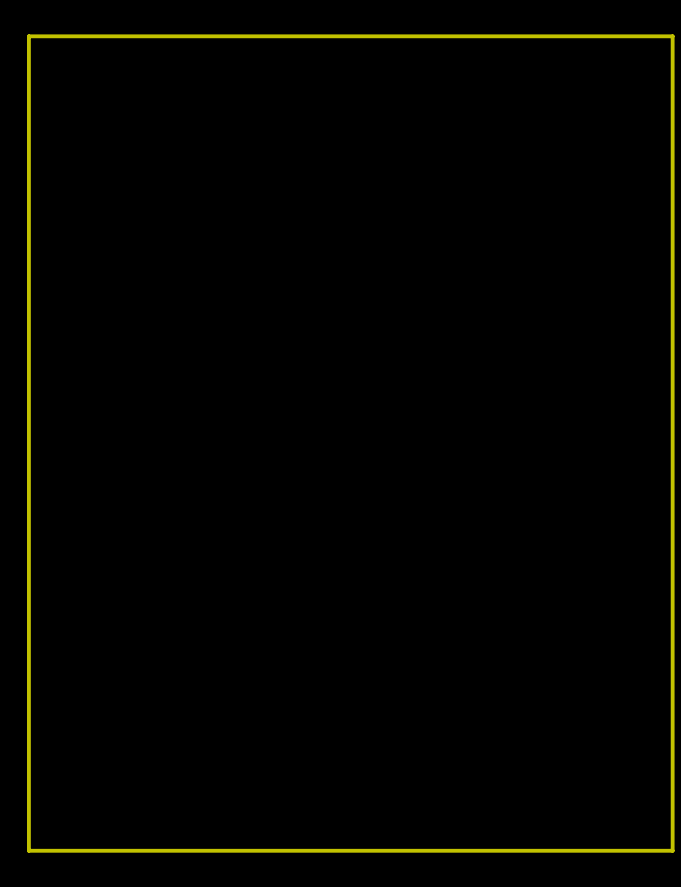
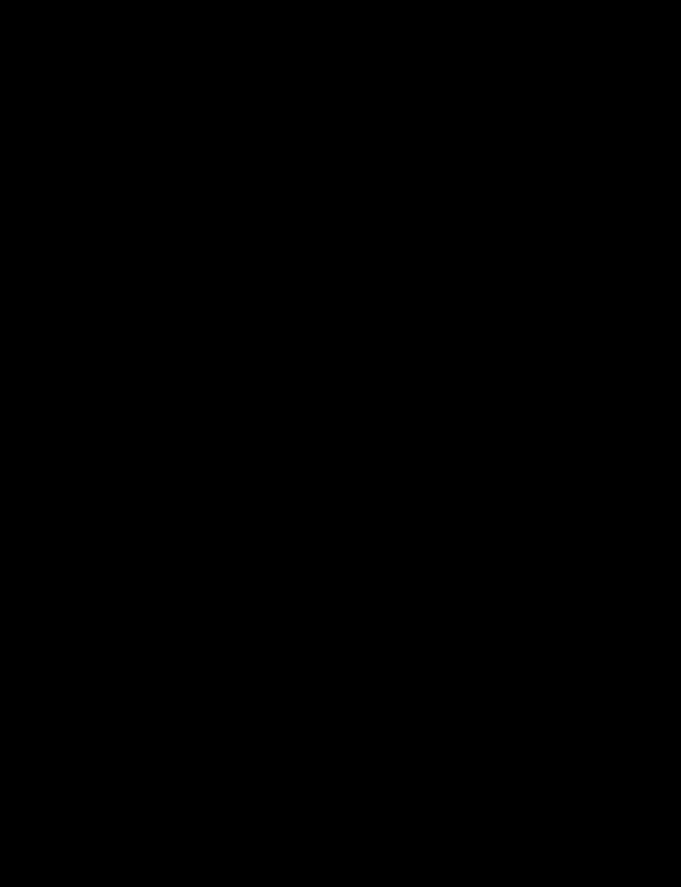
board edge: (28, 36) (28, 850) (672, 850) (672, 36) (28, 36) -> none

